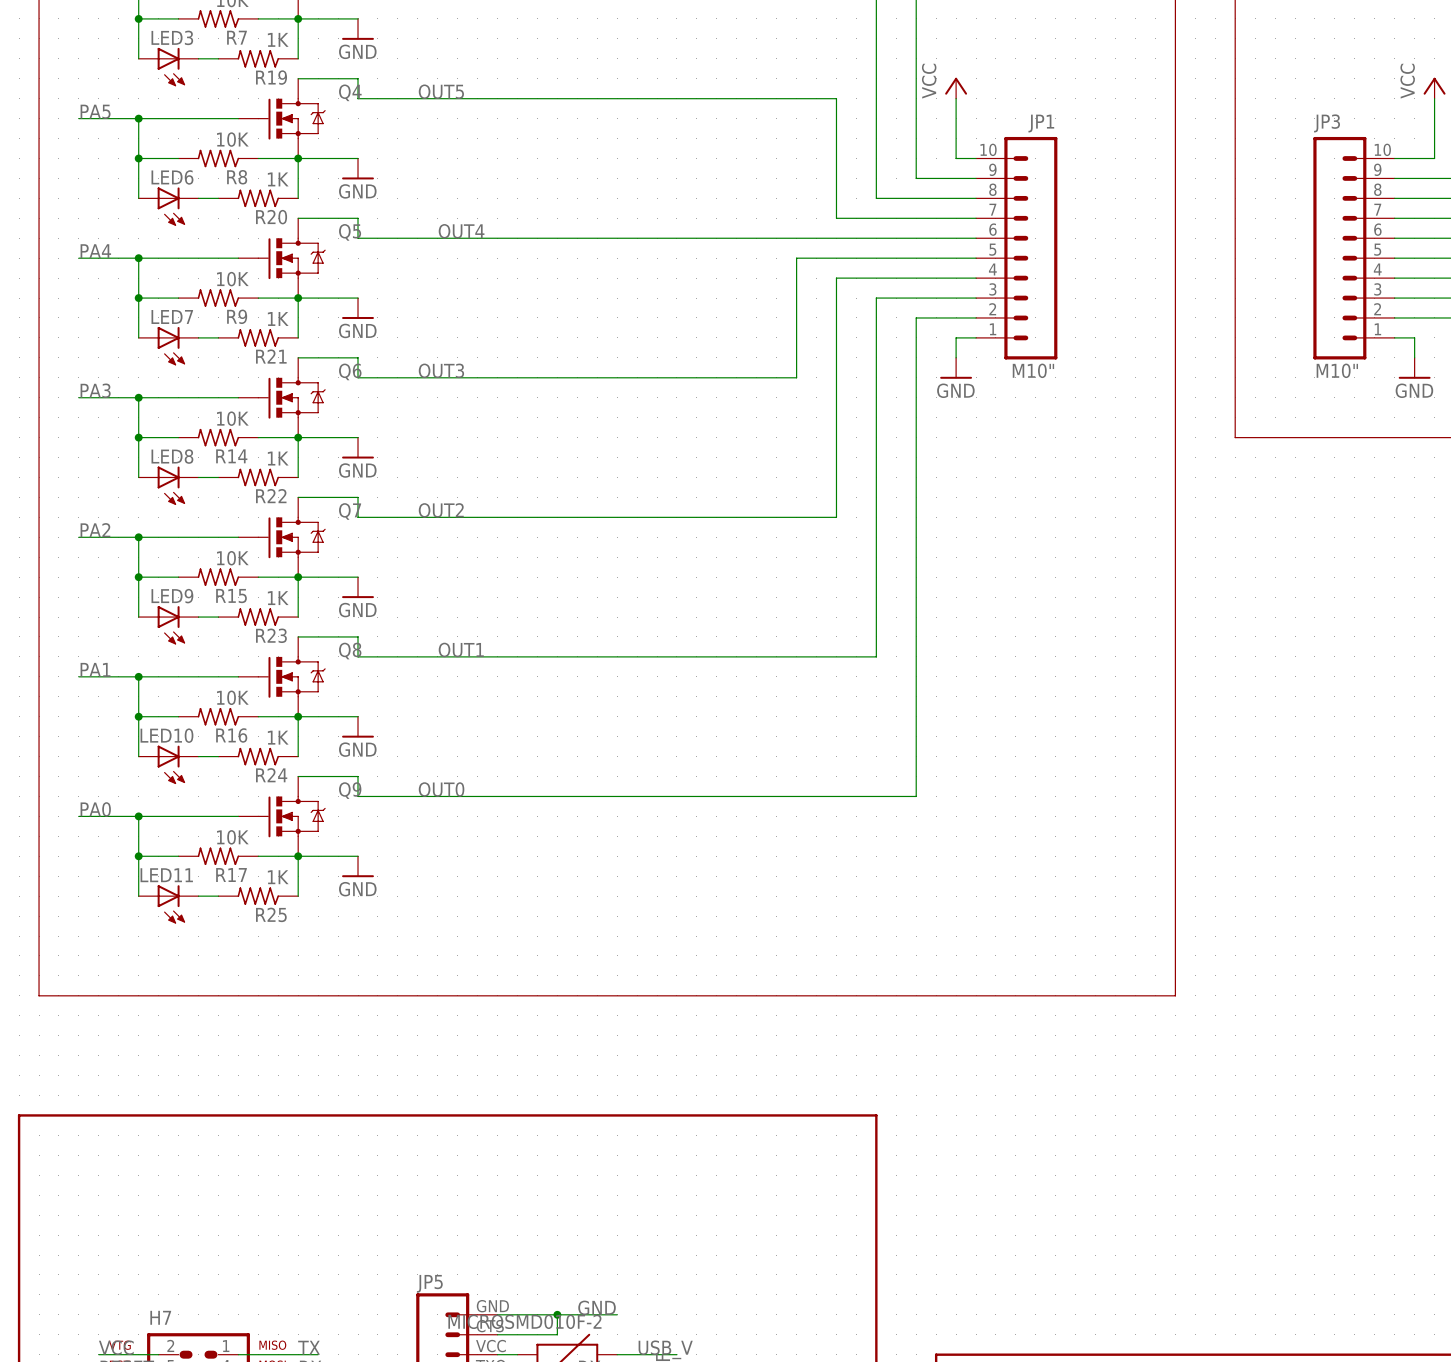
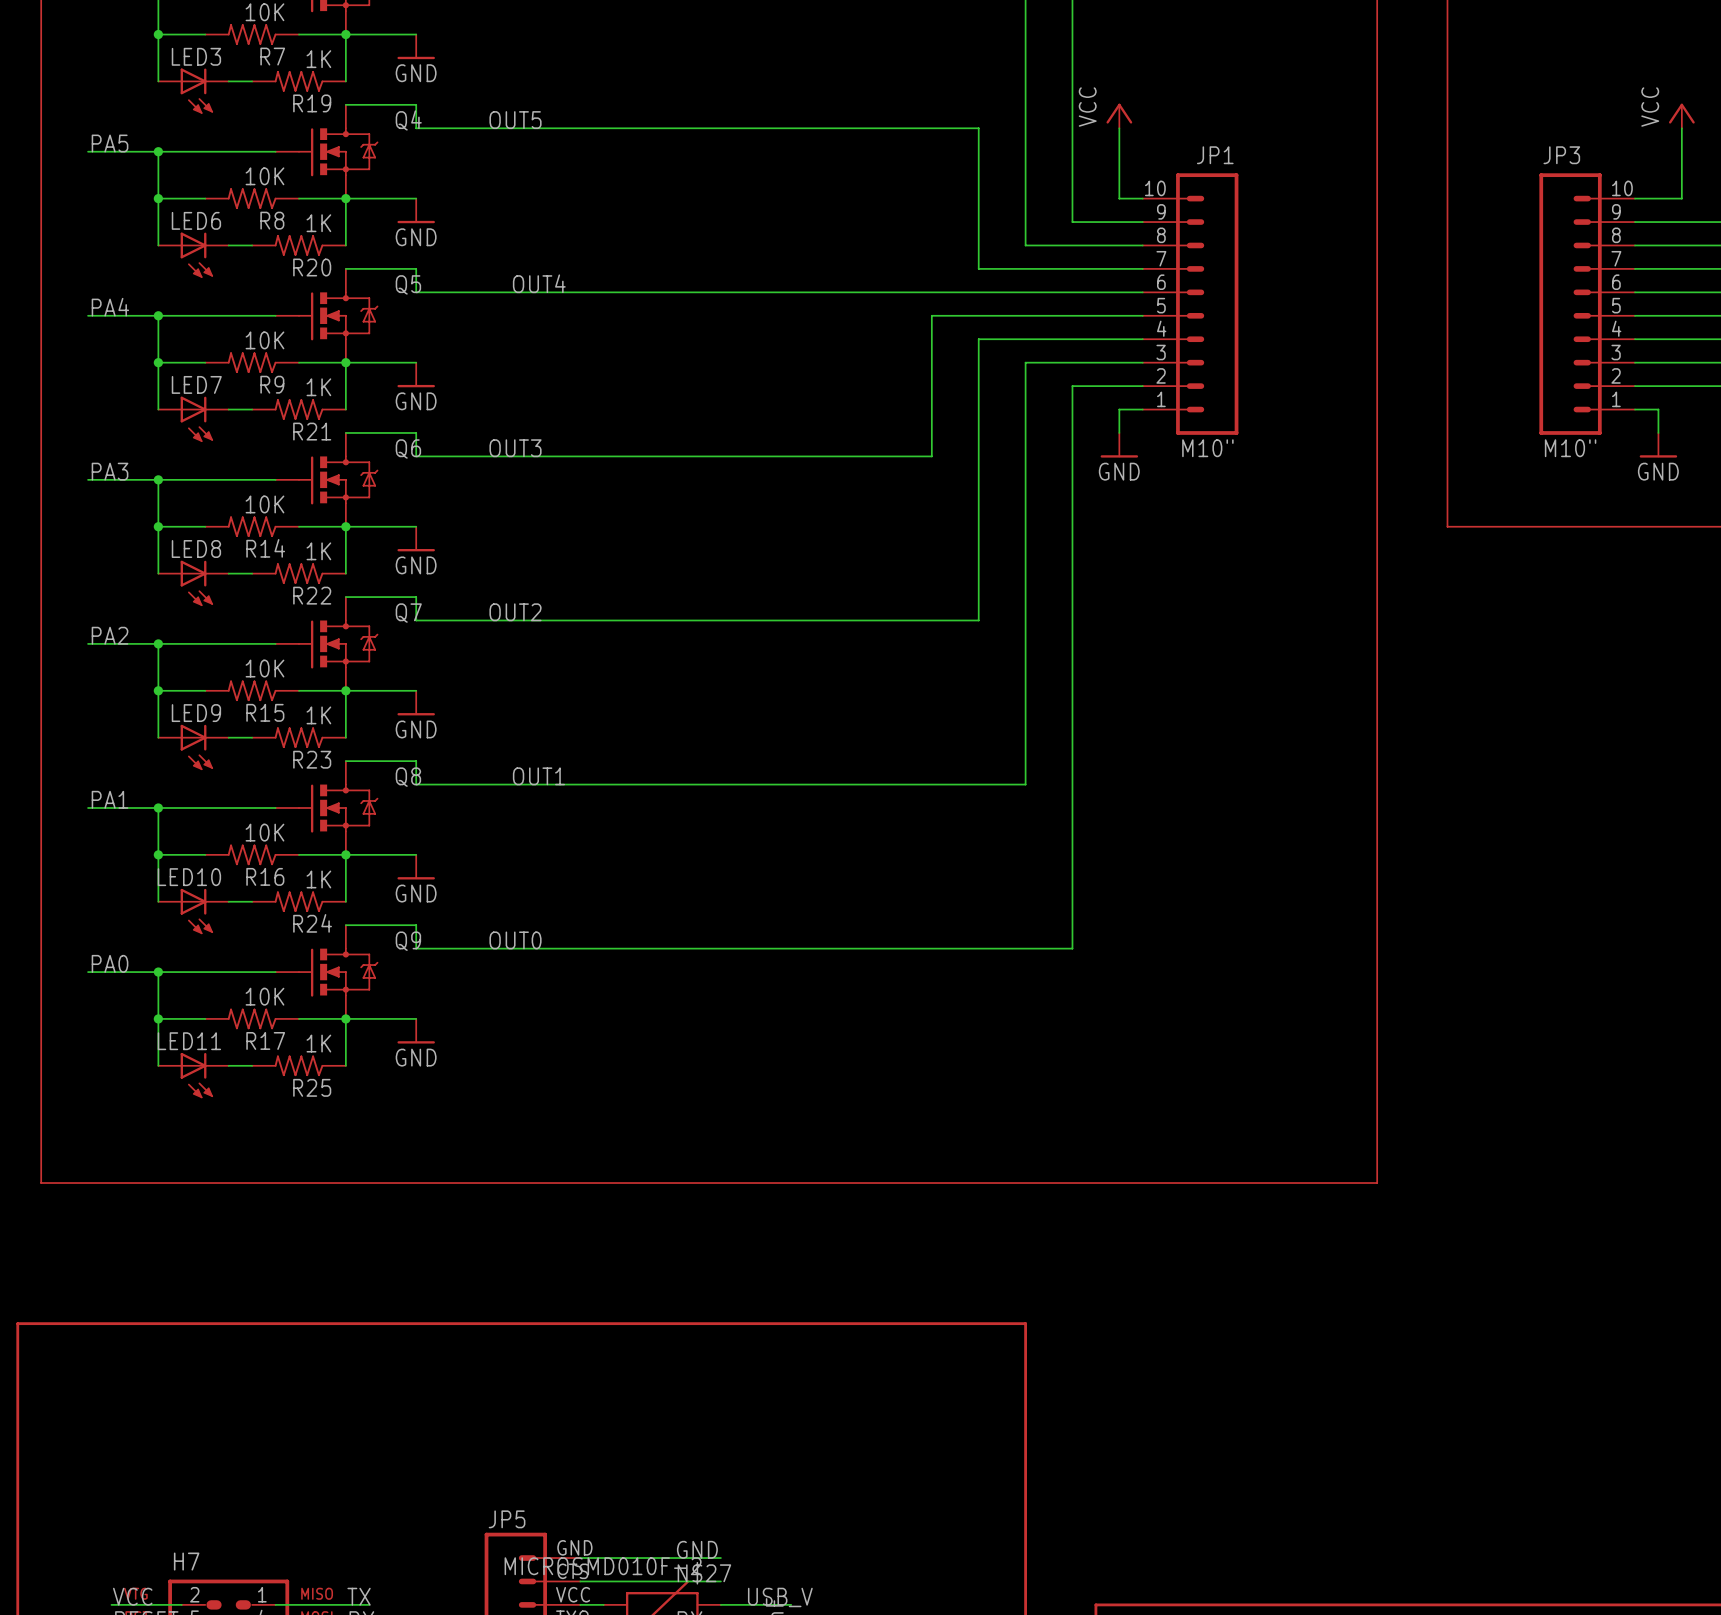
wire: (557, 1314) (557, 1334) -> (720, 1581) (650, 1581)
junction: (557, 1314) -> none
label: none -> N$27 (704, 1573)

